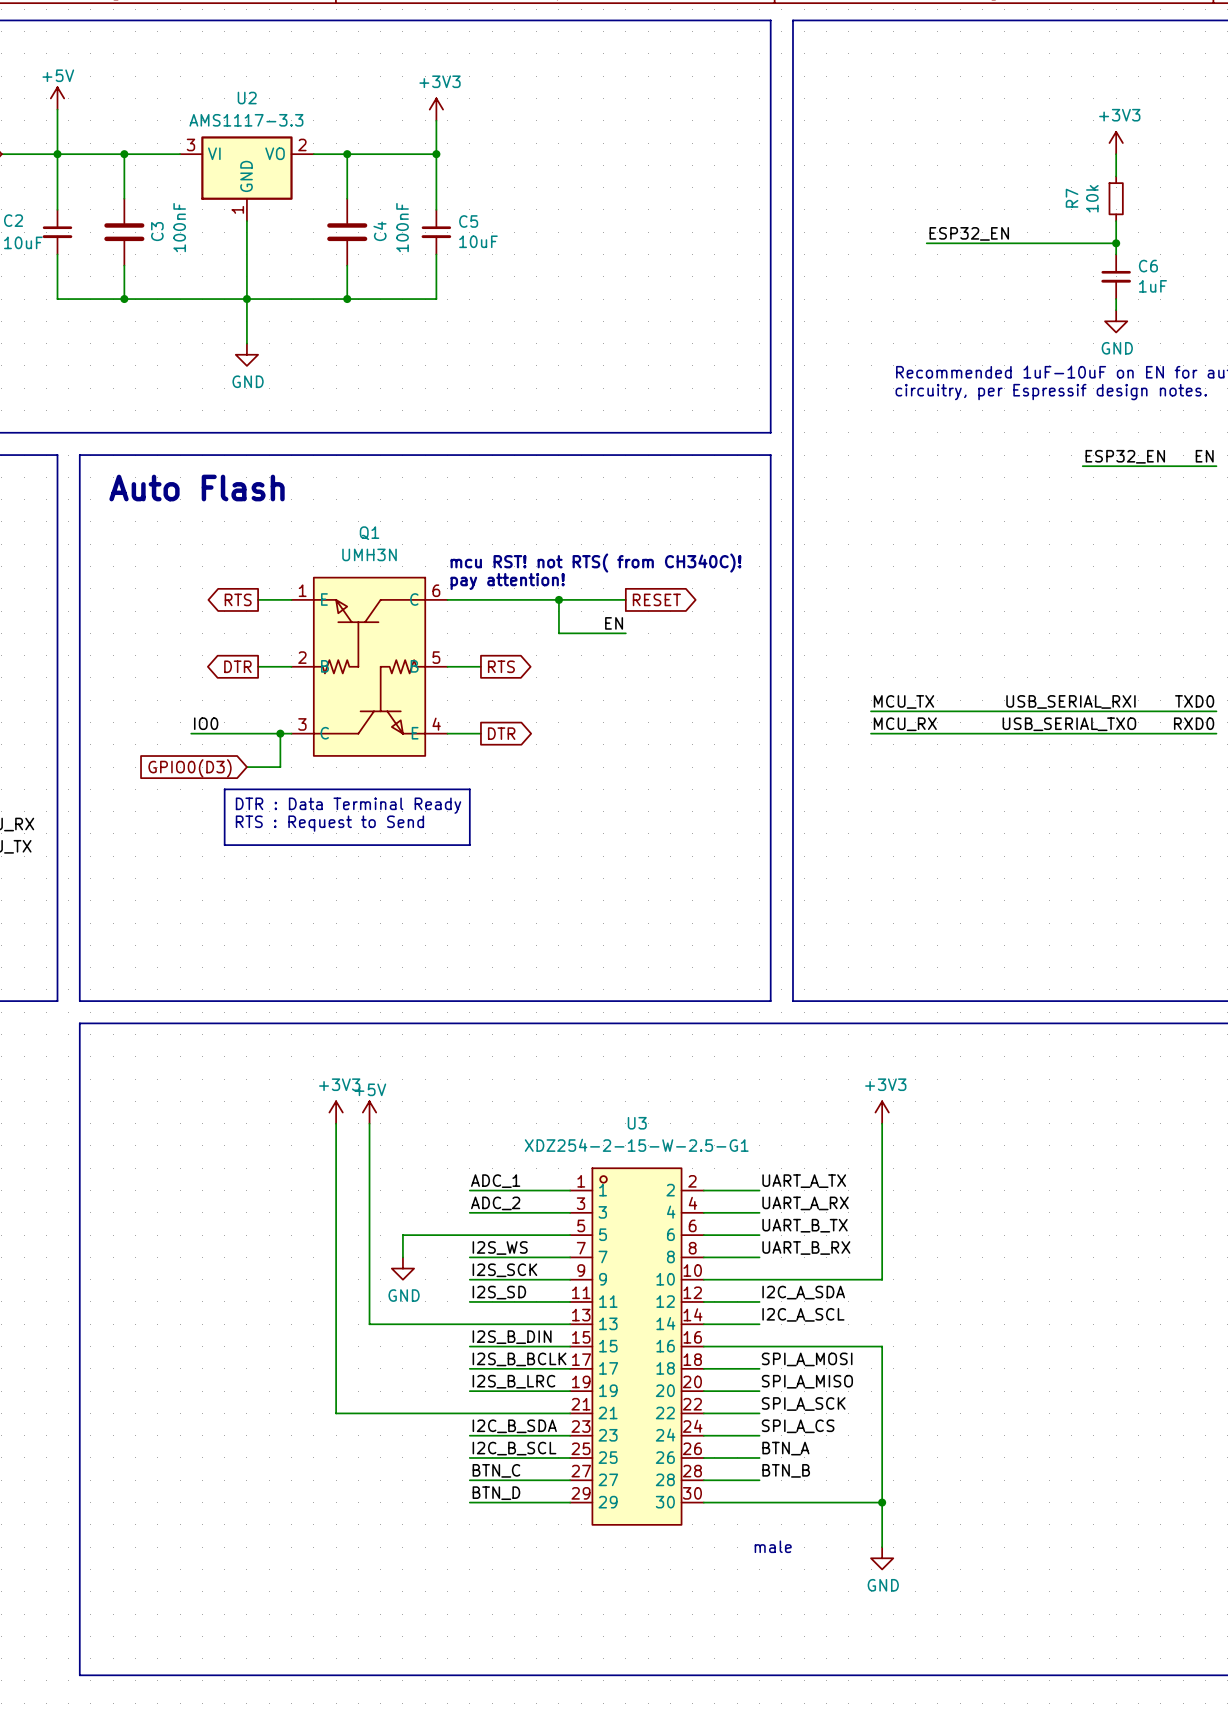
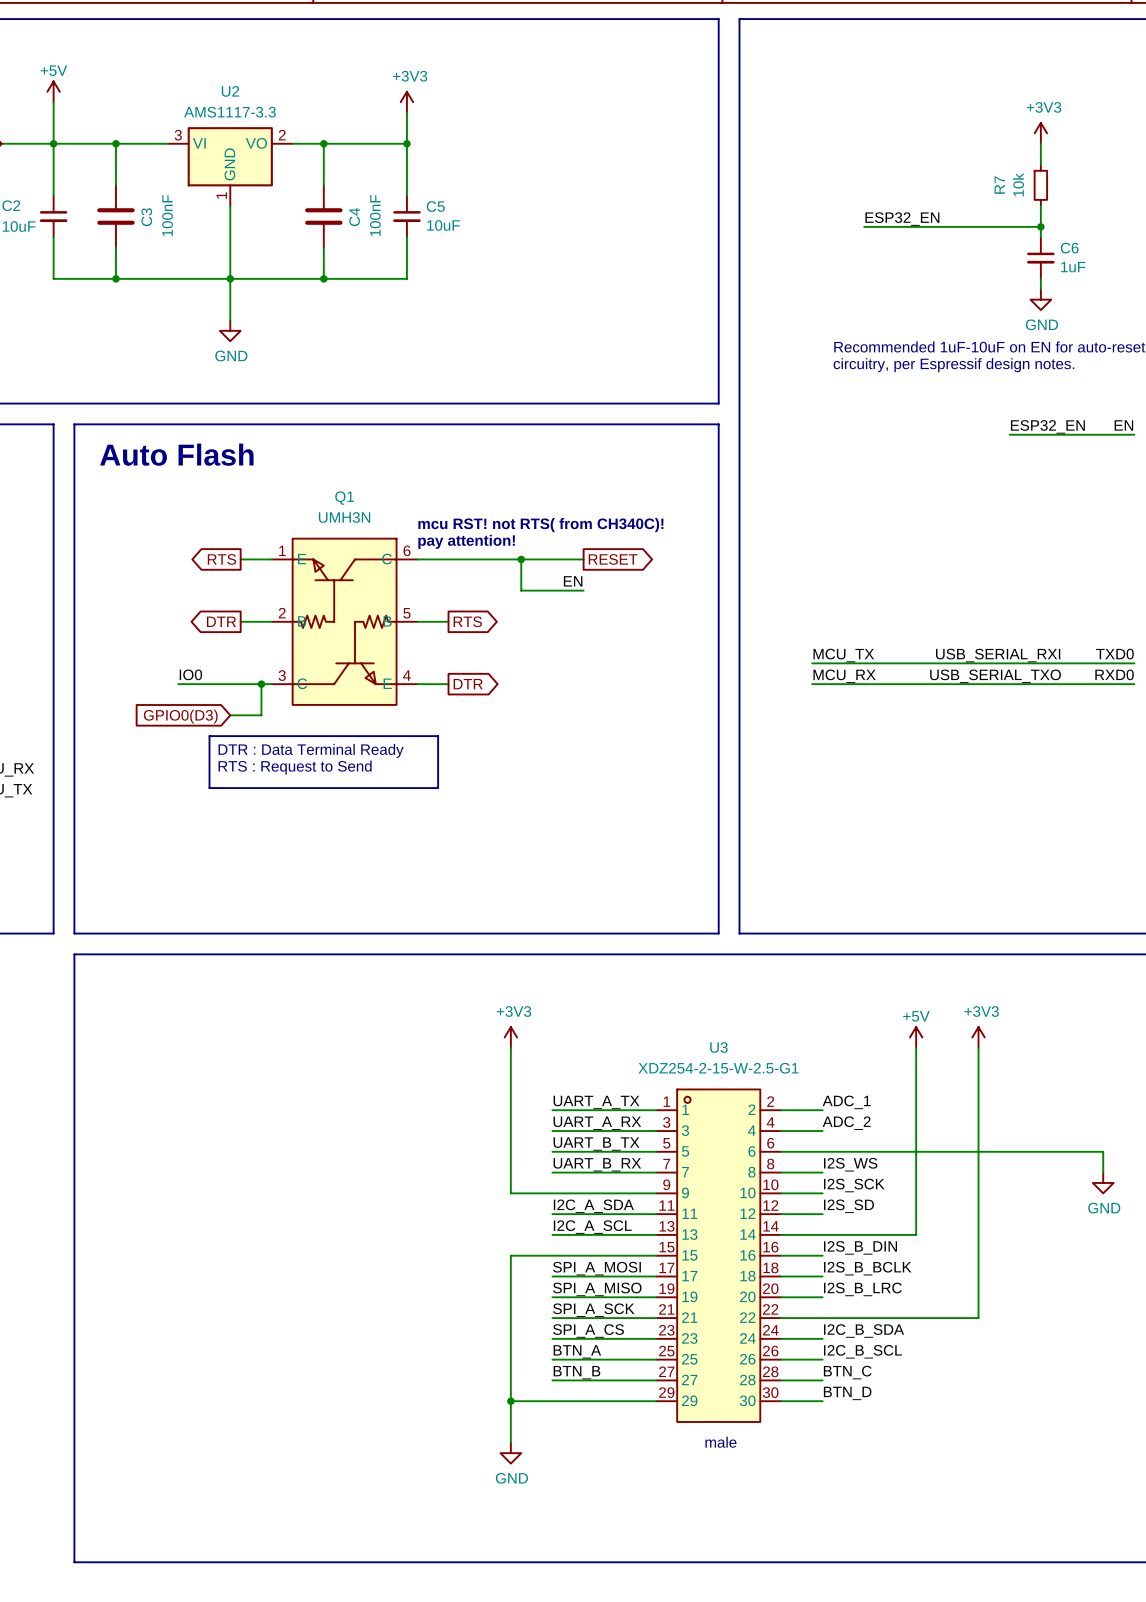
power symbol: +3V3 (336, 1112) -> none
power symbol: +5V (369, 1112) -> none
power symbol: none -> +3V3 (510, 1037)
power symbol: +3V3 (882, 1112) -> none
power symbol: none -> +5V (916, 1037)
power symbol: none -> +3V3 (978, 1037)
wire: (336, 1123) (336, 1413) (570, 1413) -> none
wire: (369, 1123) (369, 1324) (570, 1324) -> none
wire: (882, 1123) (882, 1279) -> none
wire: none -> (916, 1047) (916, 1234) (781, 1234)
wire: none -> (978, 1047) (978, 1318) (781, 1318)
label: ADC_1 (495, 1181) -> none
label position: UART_A_TX (804, 1181) -> UART_A_TX (596, 1102)
label: none -> ADC_1 (846, 1102)
wire: (469, 1190) (570, 1190) -> none
wire: none -> (781, 1110) (822, 1110)
label: ADC_2 (495, 1203) -> none
label position: UART_A_RX (805, 1203) -> UART_A_RX (597, 1123)
label: none -> ADC_2 (846, 1123)
wire: (469, 1212) (570, 1212) -> none
wire: none -> (781, 1131) (822, 1131)
label position: UART_B_TX (805, 1225) -> UART_B_TX (596, 1144)
wire: (570, 1235) (402, 1235) (402, 1257) -> none
wire: none -> (781, 1151) (1103, 1151) (1103, 1172)
label: I2S_WS (500, 1247) -> none
label position: UART_B_RX (806, 1247) -> UART_B_RX (597, 1164)
label: none -> I2S_WS (850, 1164)
wire: (469, 1257) (570, 1257) -> none
wire: none -> (781, 1172) (822, 1172)
power symbol: GND (402, 1268) -> none
power symbol: none -> GND (1103, 1182)
label: I2S_SCK (504, 1270) -> none
label: none -> I2S_SCK (854, 1185)
wire: (469, 1279) (547, 1279) -> (510, 1047) (510, 1193)
label: I2S_SD (499, 1292) -> none
label position: I2C_A_SDA (803, 1292) -> I2C_A_SDA (593, 1206)
label: none -> I2S_SD (849, 1206)
wire: (469, 1301) (570, 1301) -> none
wire: none -> (781, 1214) (822, 1214)
label position: I2C_A_SCL (803, 1314) -> I2C_A_SCL (592, 1227)
label: I2S_B_DIN (512, 1337) -> none
label: none -> I2S_B_DIN (860, 1247)
wire: (469, 1346) (547, 1346) -> (510, 1442) (510, 1255)
U3 position: (636, 1346) -> (718, 1255)
wire: (882, 1346) (882, 1547) -> none
label: I2S_B_BCLK (519, 1359) -> none
label position: SPI_A_MOSI (807, 1359) -> SPI_A_MOSI (597, 1268)
label: none -> I2S_B_BCLK (867, 1268)
wire: (469, 1368) (570, 1368) -> none
wire: none -> (781, 1276) (822, 1276)
label: I2S_B_LRC (513, 1381) -> none
label position: SPI_A_MISO (807, 1381) -> SPI_A_MISO (597, 1289)
label: none -> I2S_B_LRC (862, 1289)
wire: (469, 1391) (570, 1391) -> none
wire: none -> (781, 1297) (822, 1297)
label position: SPI_A_SCK (803, 1404) -> SPI_A_SCK (593, 1310)
label: I2C_B_SDA (514, 1426) -> none
label position: SPI_A_CS (798, 1426) -> SPI_A_CS (588, 1331)
label: none -> I2C_B_SDA (864, 1331)
wire: (469, 1435) (570, 1435) -> none
wire: none -> (781, 1338) (822, 1338)
label: I2C_B_SCL (514, 1448) -> none
label position: BTN_A (785, 1448) -> BTN_A (577, 1351)
label: none -> I2C_B_SCL (862, 1351)
wire: (469, 1457) (570, 1457) -> none
wire: none -> (781, 1359) (822, 1359)
label: BTN_C (496, 1470) -> none
label position: BTN_B (786, 1470) -> BTN_B (577, 1372)
label: none -> BTN_C (847, 1372)
wire: (469, 1480) (570, 1480) -> none
wire: none -> (781, 1380) (822, 1380)
label: BTN_D (496, 1493) -> none
label: none -> BTN_D (847, 1393)
wire: (469, 1502) (547, 1502) -> none
junction: none -> (510, 1401)
junction: (882, 1502) -> none
power symbol: none -> GND (510, 1453)
power symbol: GND (882, 1558) -> none

